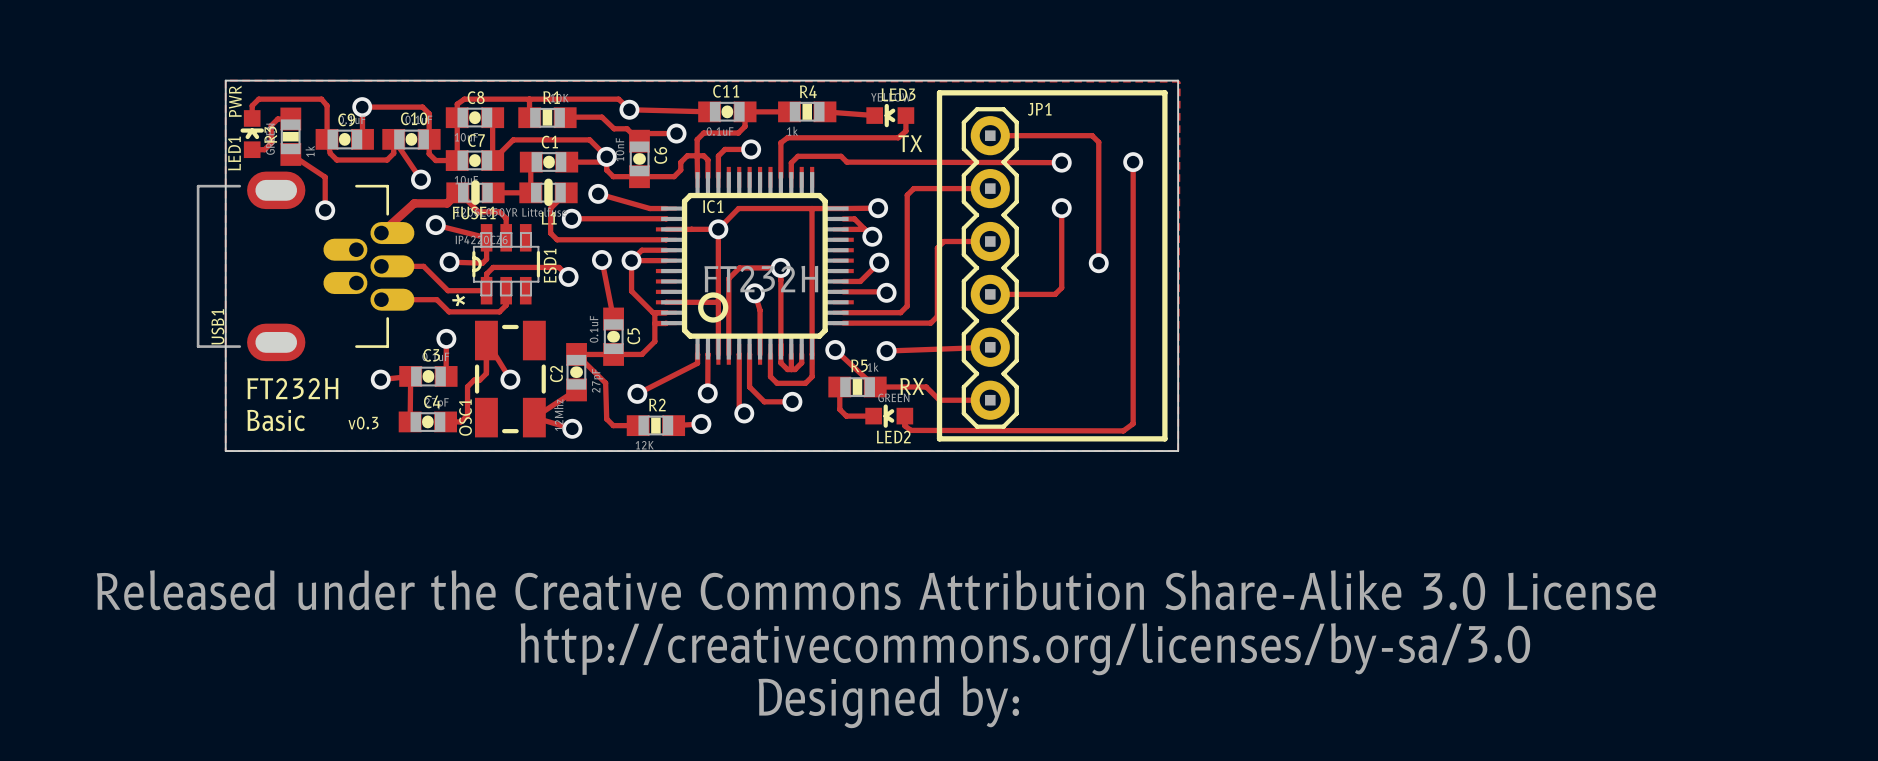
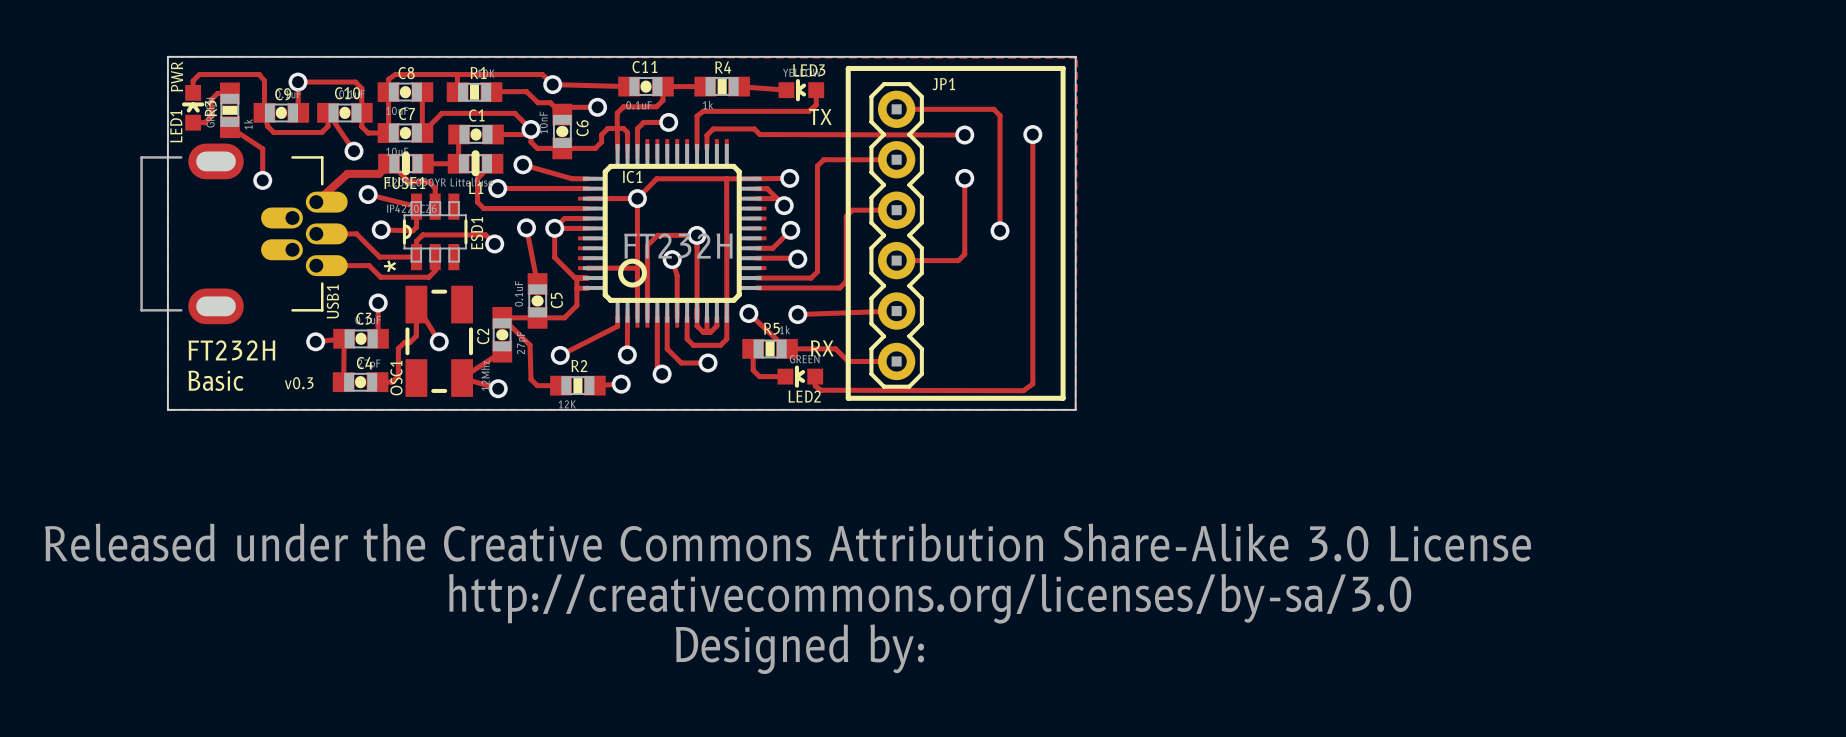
USB1 name position: USB1 (217, 326) -> USB1 (332, 301)

